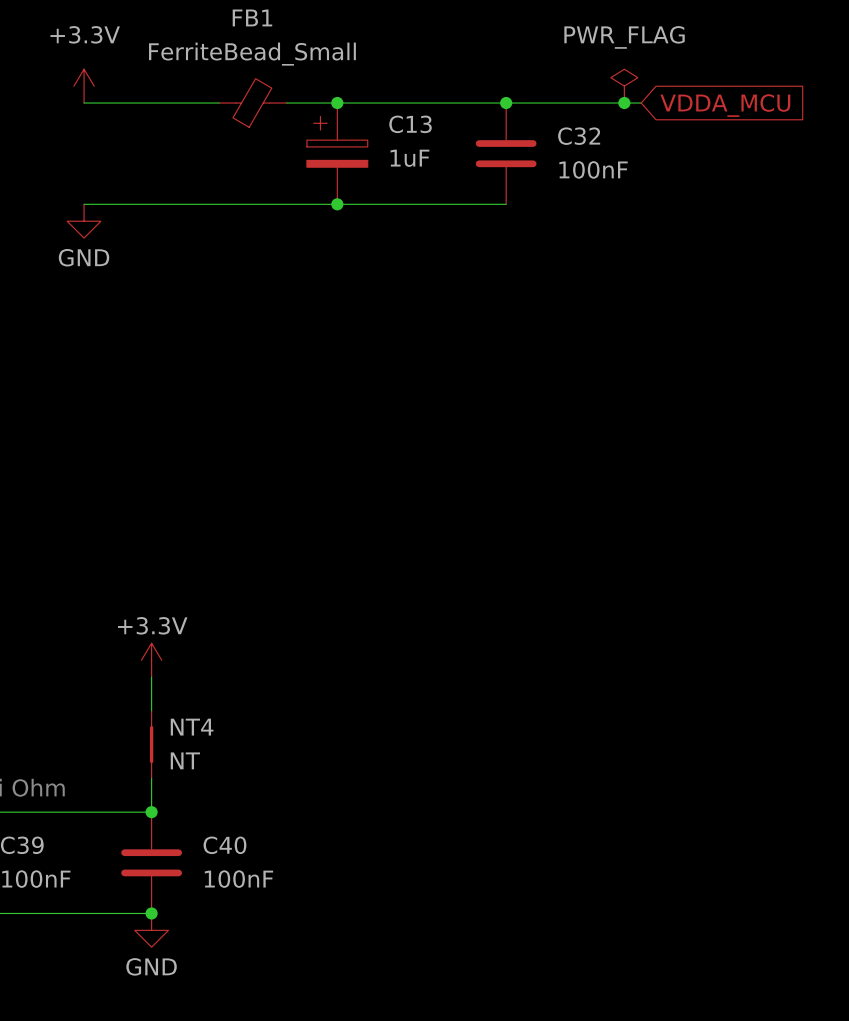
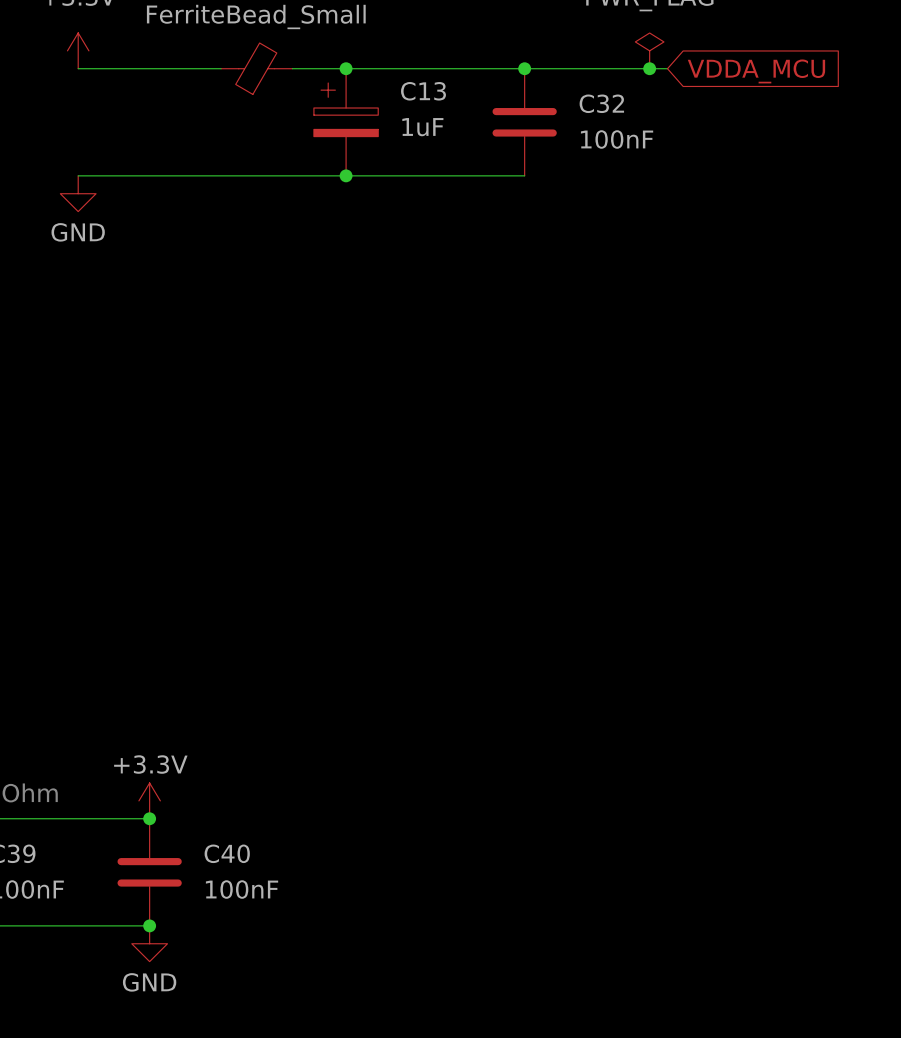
power symbol position: +3.3V (151, 660) -> +3.3V (149, 800)
wire: (151, 677) (151, 710) -> none
NT4: NT (151, 744) -> none

